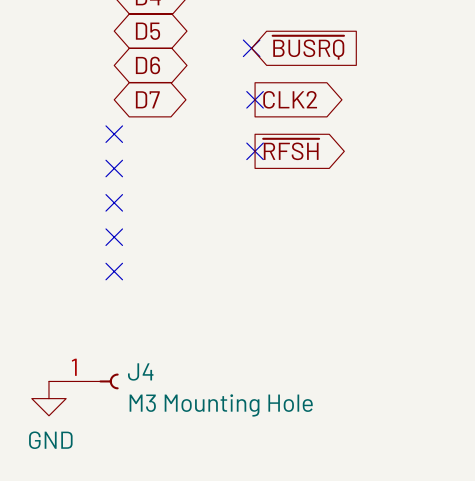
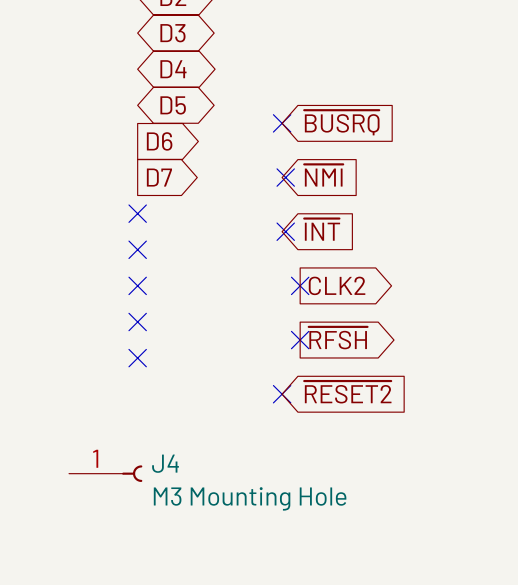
global label shape: bidirectional (148, 65) -> output (159, 141)
global label: none -> ~{NMI} (323, 175)
global label shape: bidirectional (147, 99) -> output (159, 177)
global label position: CLK2 (290, 99) -> CLK2 (337, 285)
global label: none -> ~{INT} (322, 229)
global label position: ~{RFSH} (291, 149) -> ~{RFSH} (338, 338)
no-connect mark: none -> (300, 285)
no-connect mark: none -> (300, 340)
global label: none -> ~{RESET2} (347, 392)
no-connect mark: none -> (282, 394)
power symbol: GND (48, 398) -> none

